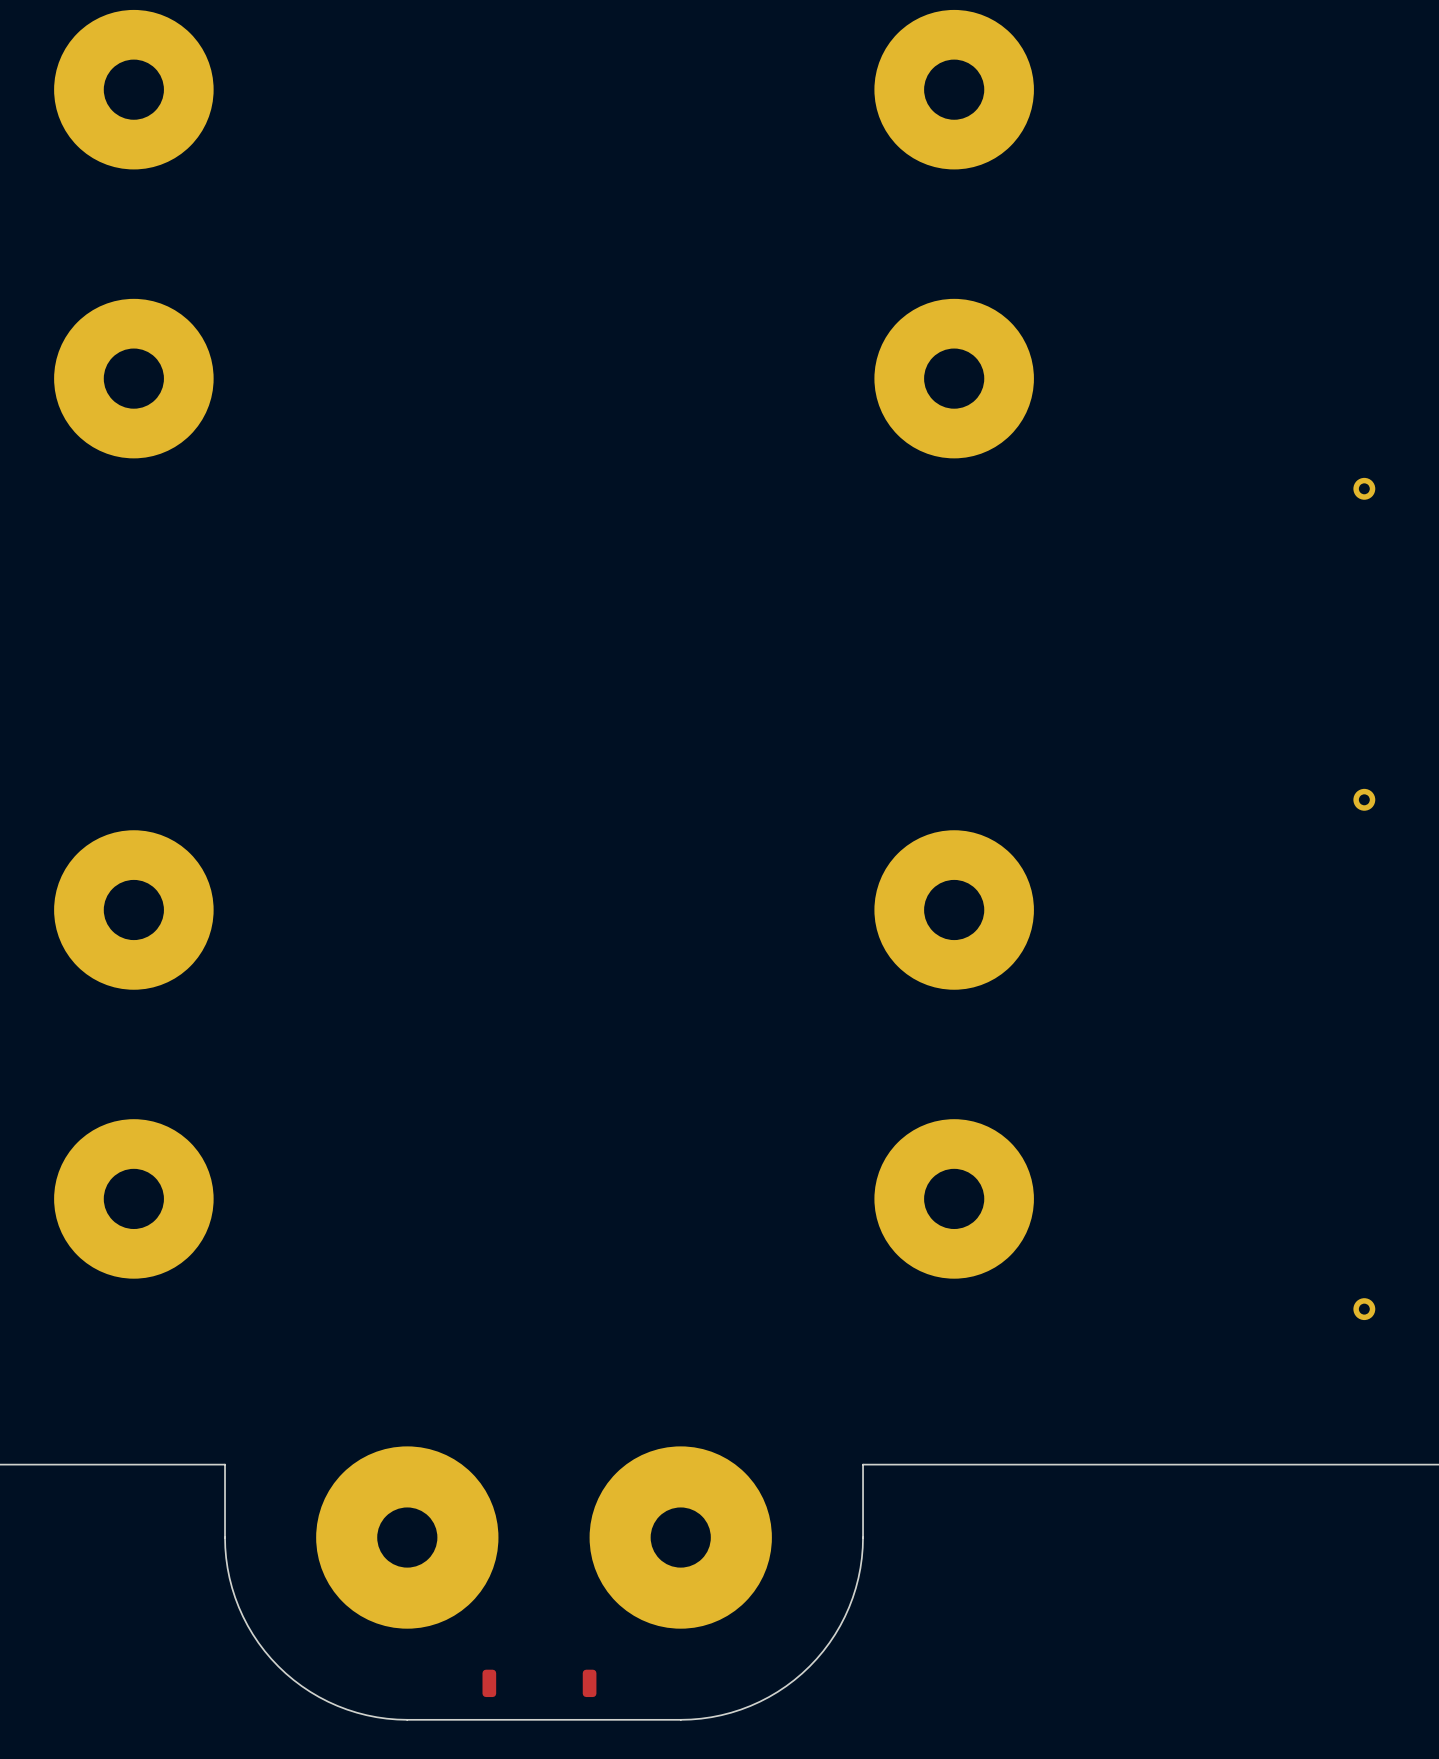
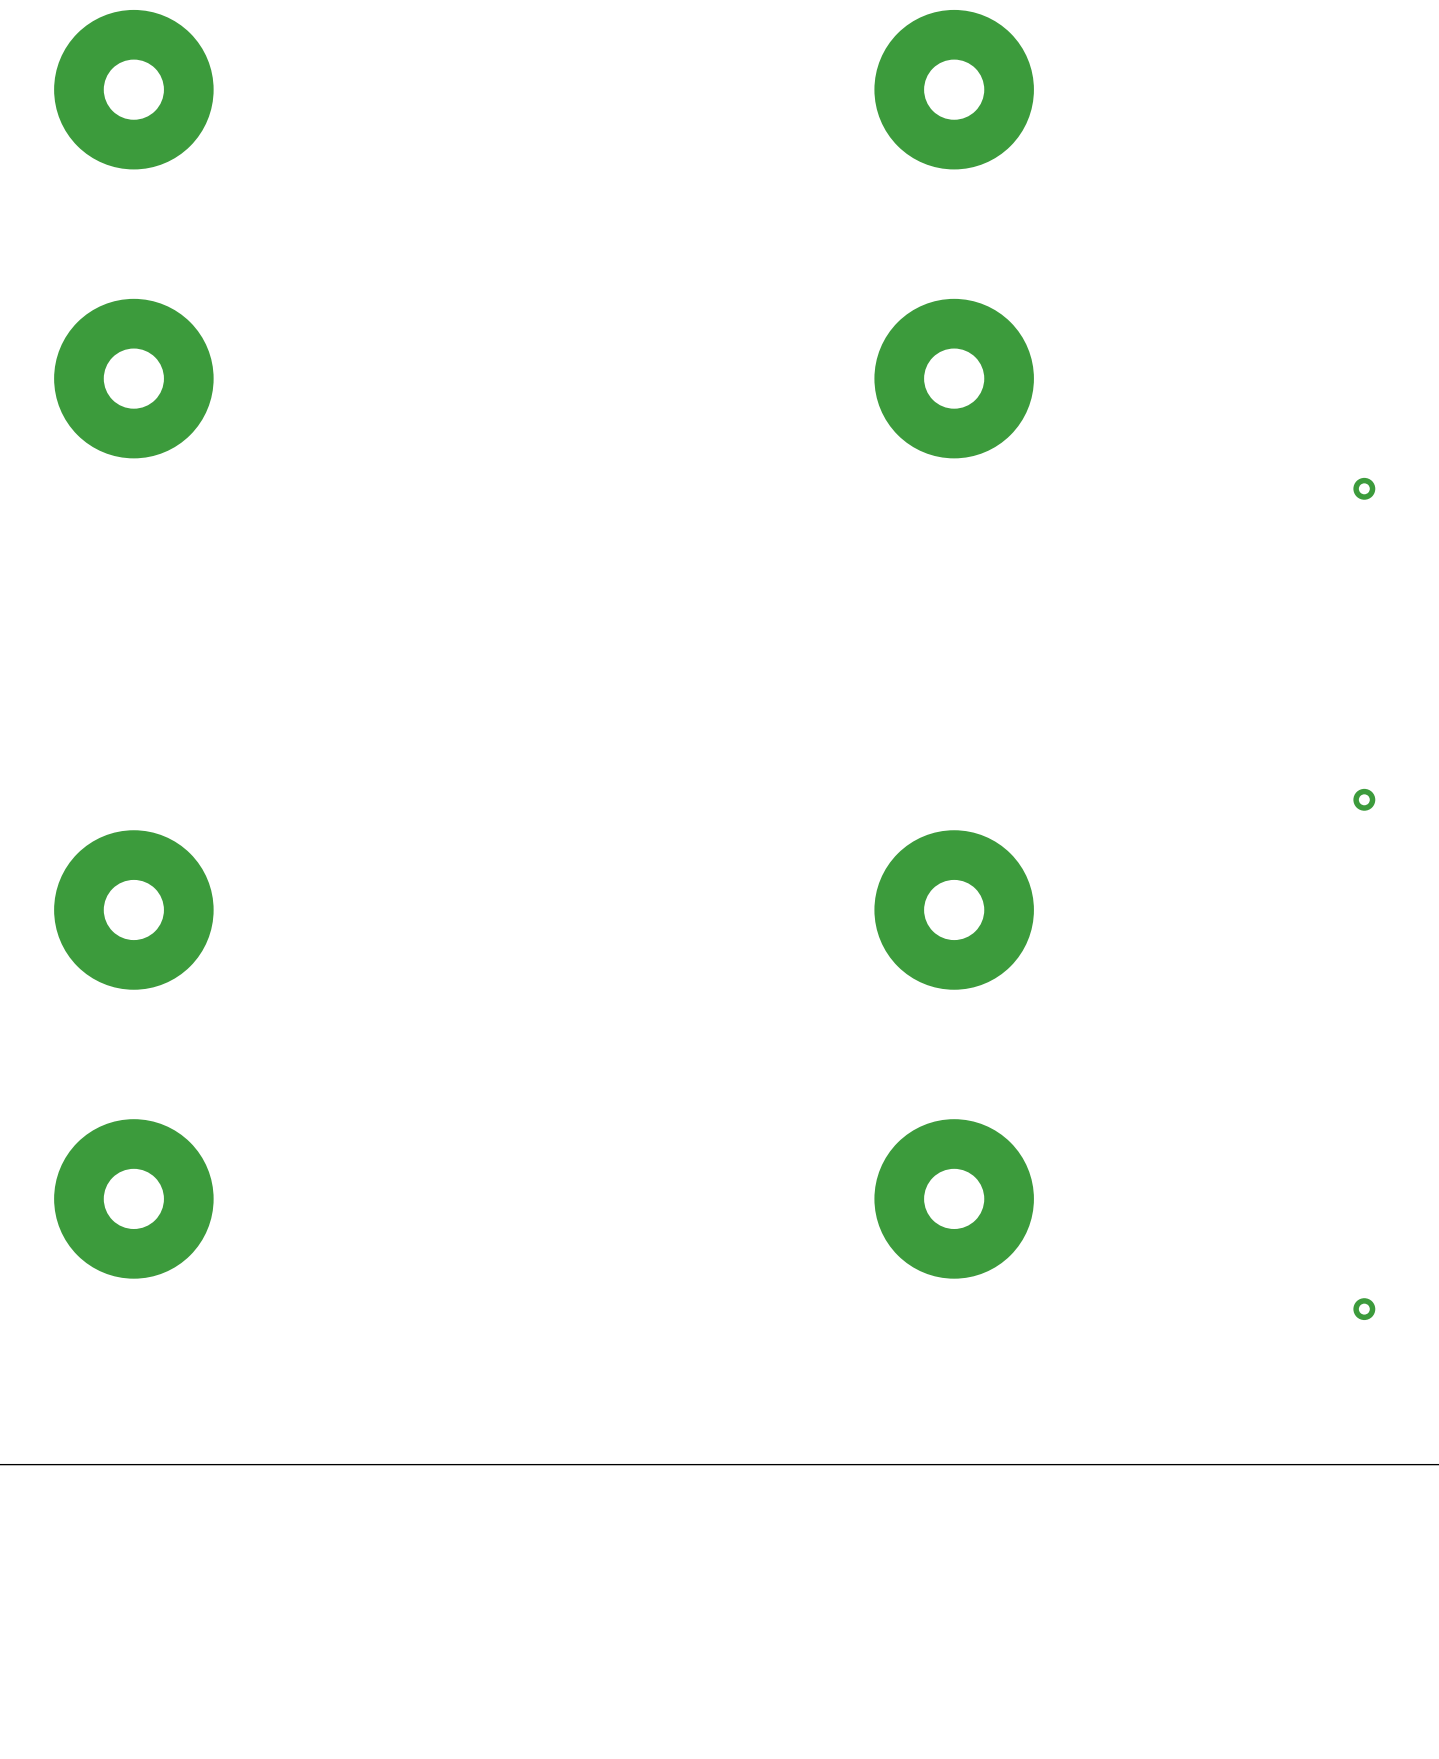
board edge: (225, 1464) (226, 1557) (229, 1578) (238, 1607) (252, 1634) (271, 1659) (293, 1680) (319, 1697) (356, 1712) (397, 1719) (680, 1719) (711, 1717) (731, 1712) (768, 1697) (802, 1673) (829, 1643) (849, 1607) (860, 1568) (863, 1537) (863, 1464) -> (225, 1464) (863, 1464)
part: (407, 1537) -> none
part: (680, 1537) -> none
part: (489, 1683) -> none
part: (589, 1683) -> none

